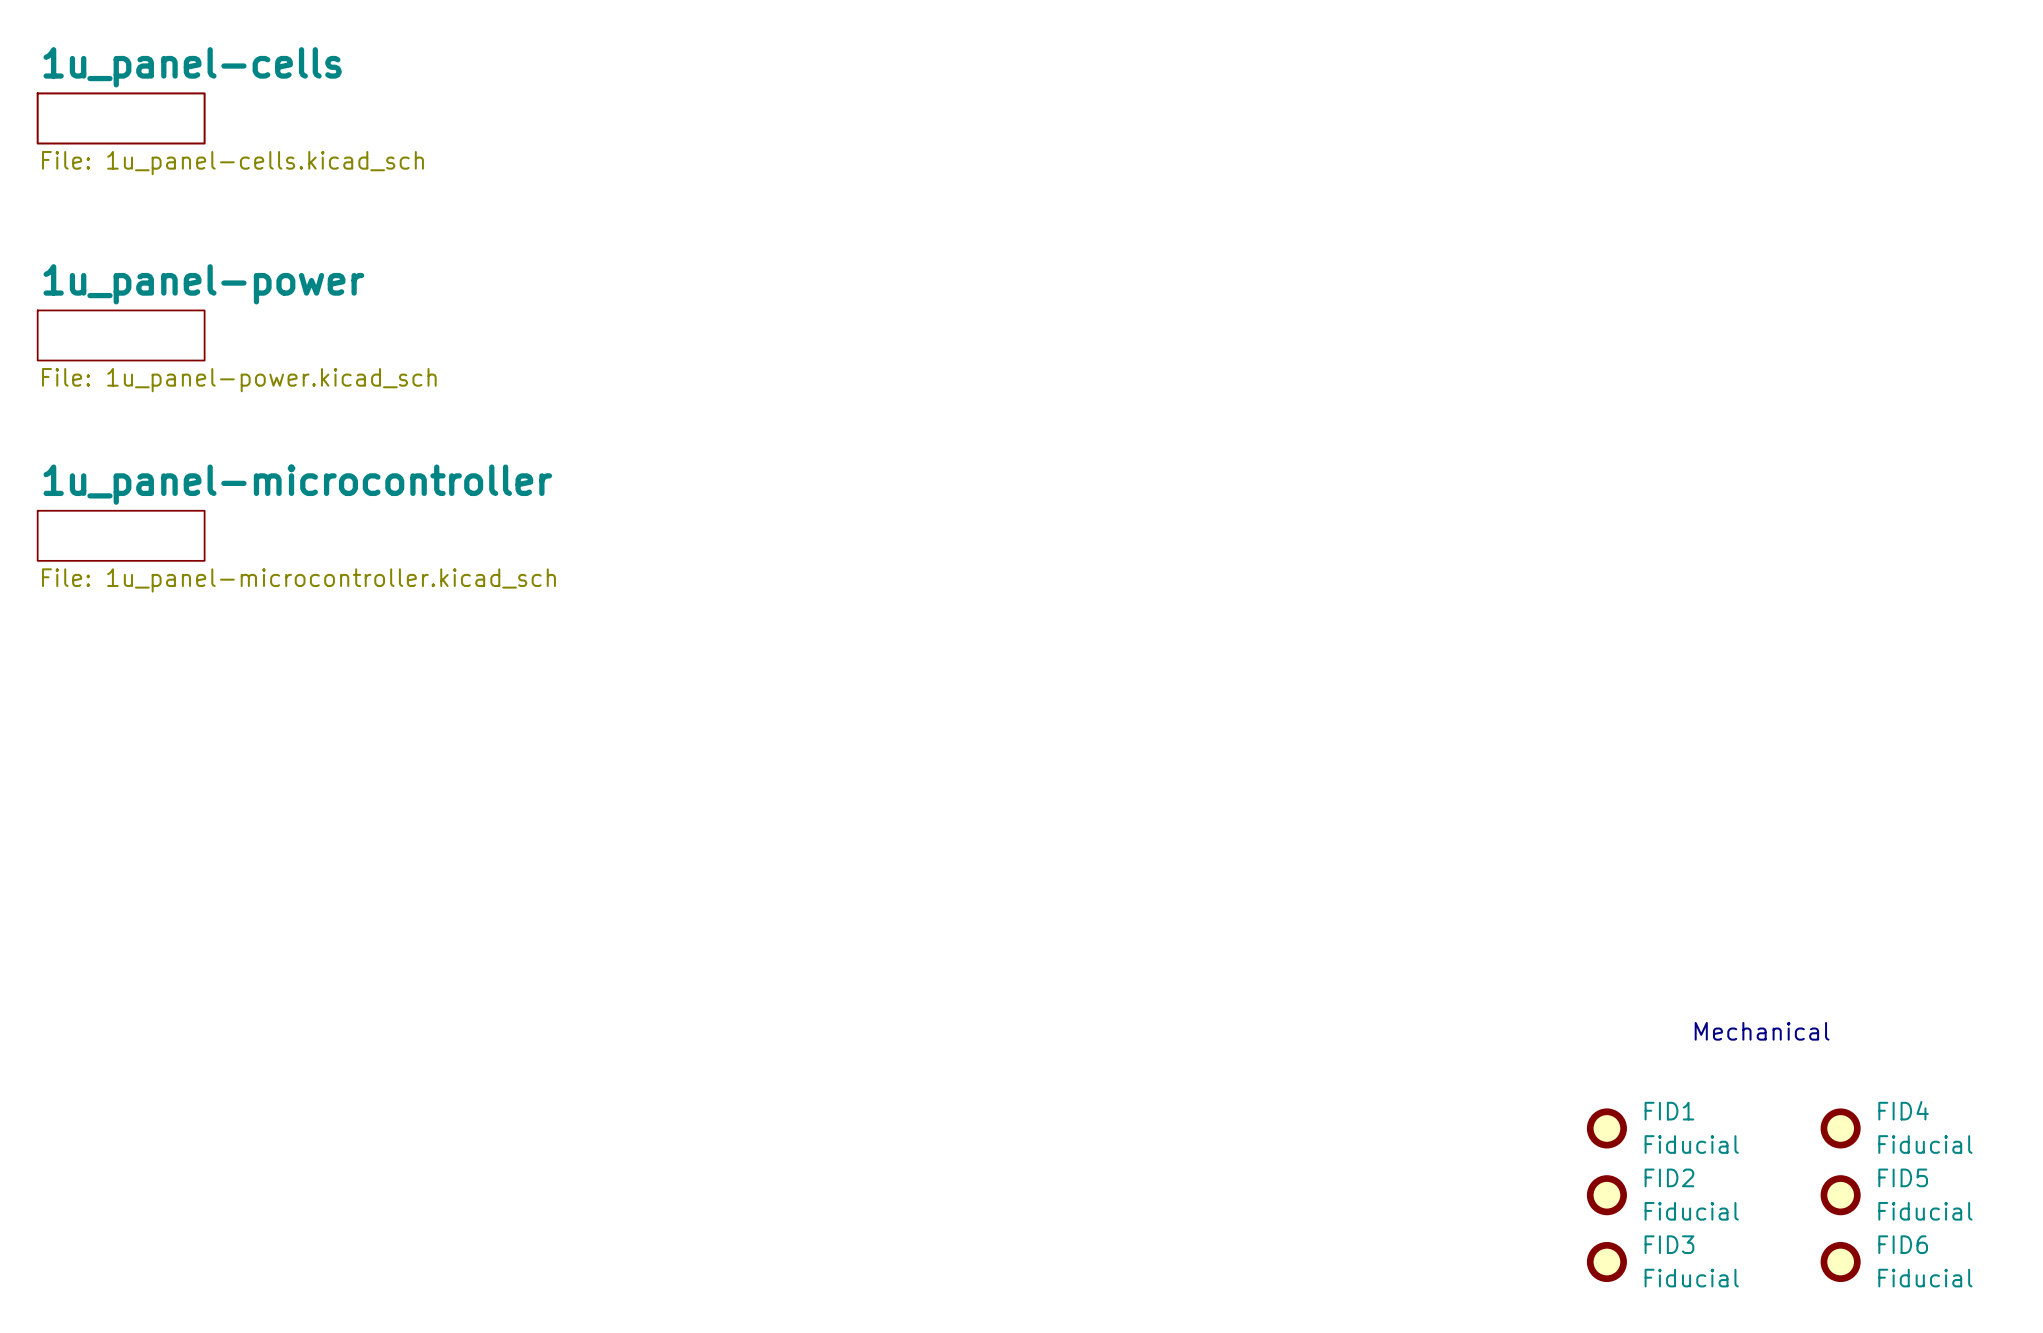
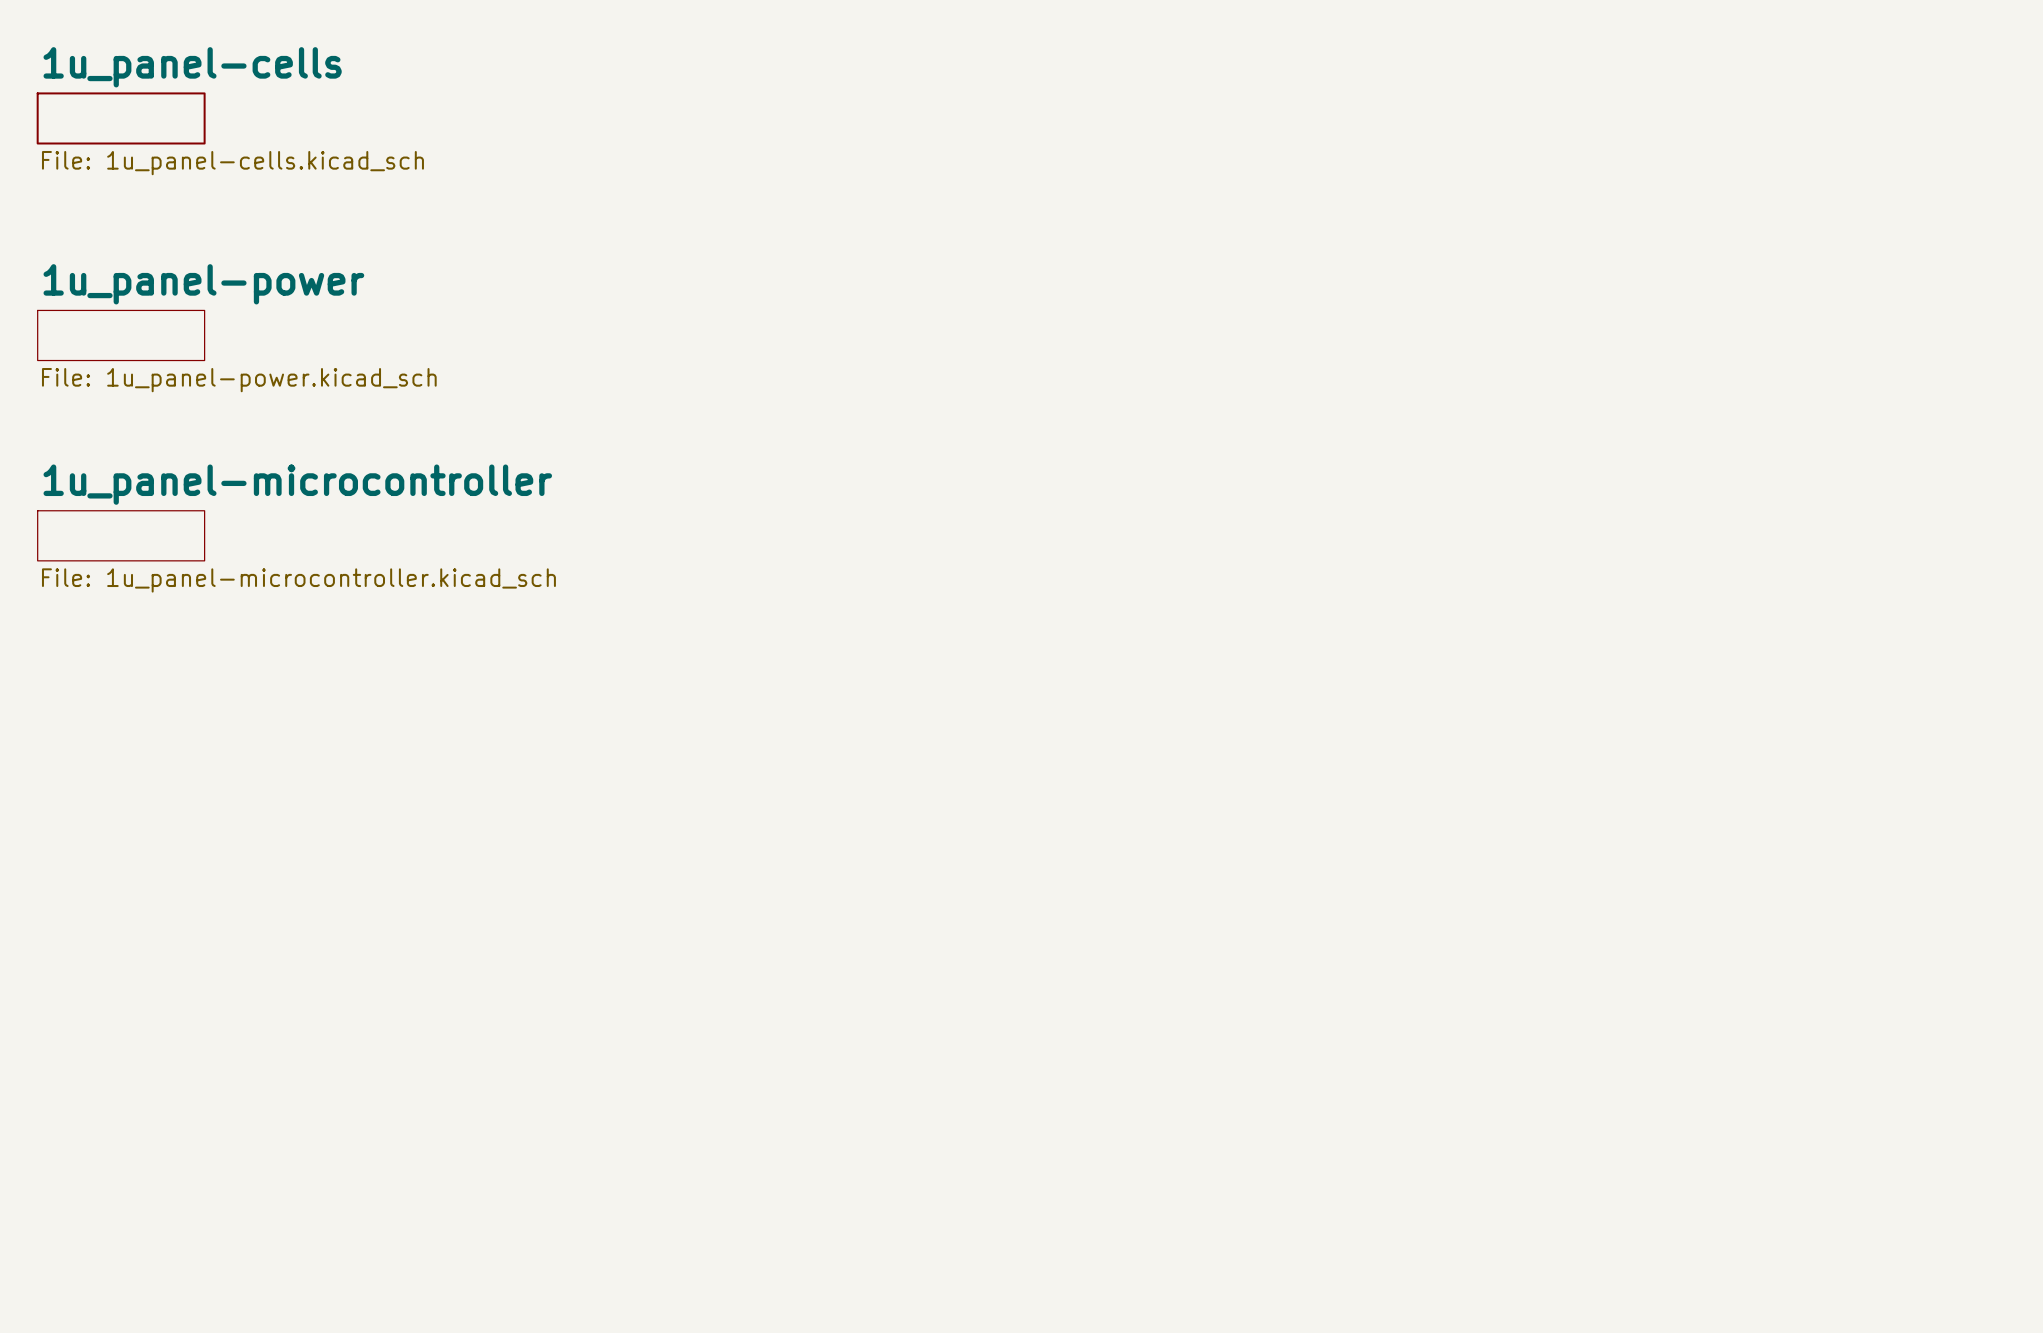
text: Mechanical (1762, 1031) -> none
FID1: Fiducial (1606, 1128) -> none
FID4: Fiducial (1840, 1128) -> none
FID2: Fiducial (1606, 1195) -> none
FID5: Fiducial (1840, 1195) -> none
FID3: Fiducial (1606, 1262) -> none
FID6: Fiducial (1840, 1262) -> none

